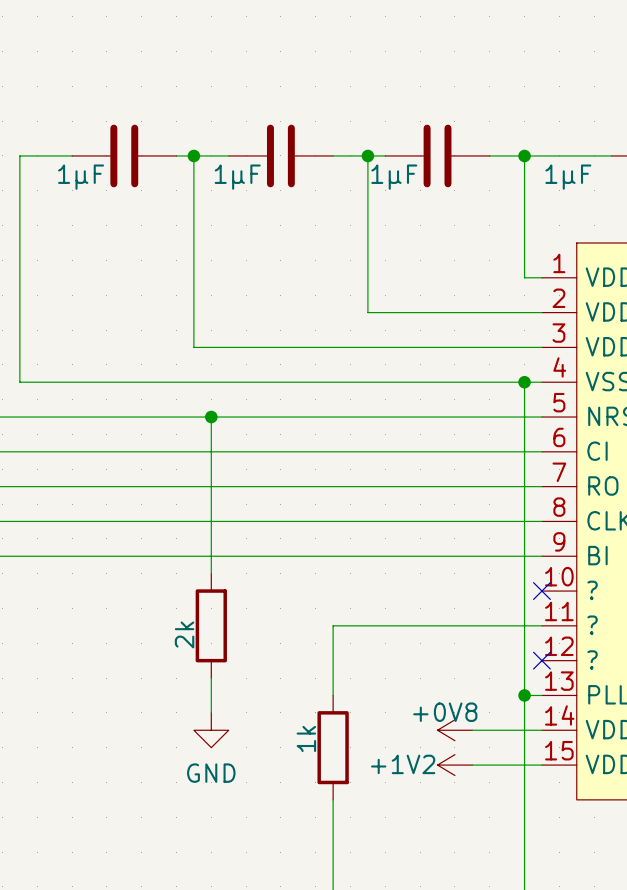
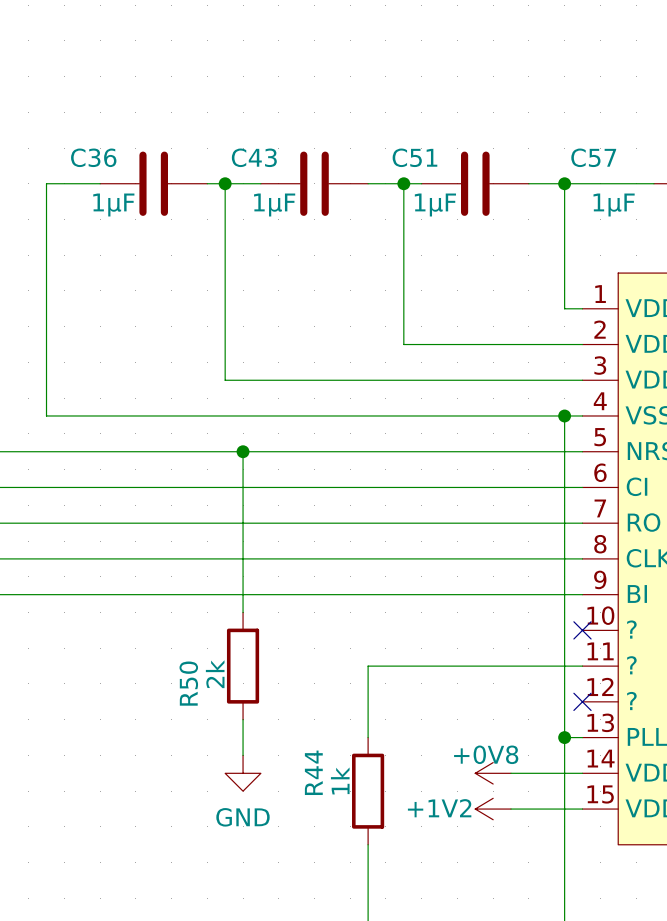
C36 name: none -> C36 (93, 157)
C43 name: none -> C43 (254, 157)
C51 name: none -> C51 (414, 157)
C57 name: none -> C57 (593, 157)
R50 name: none -> R50 (188, 683)
R44 name: none -> R44 (313, 772)

